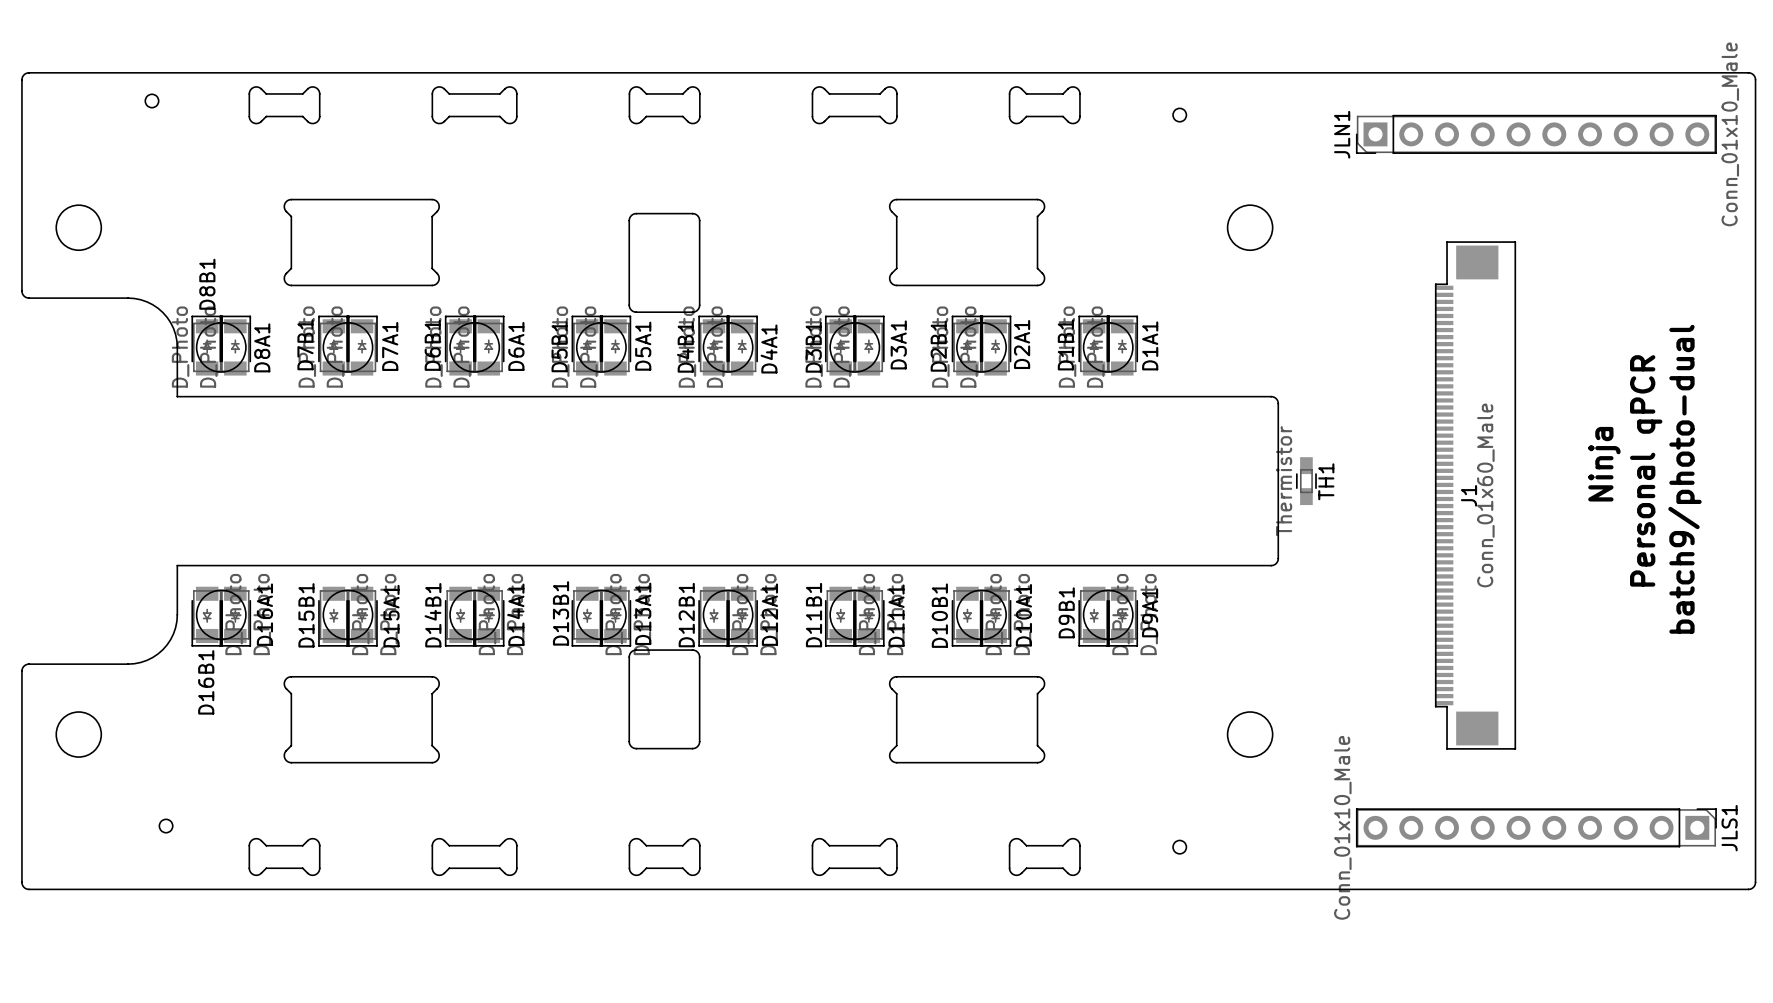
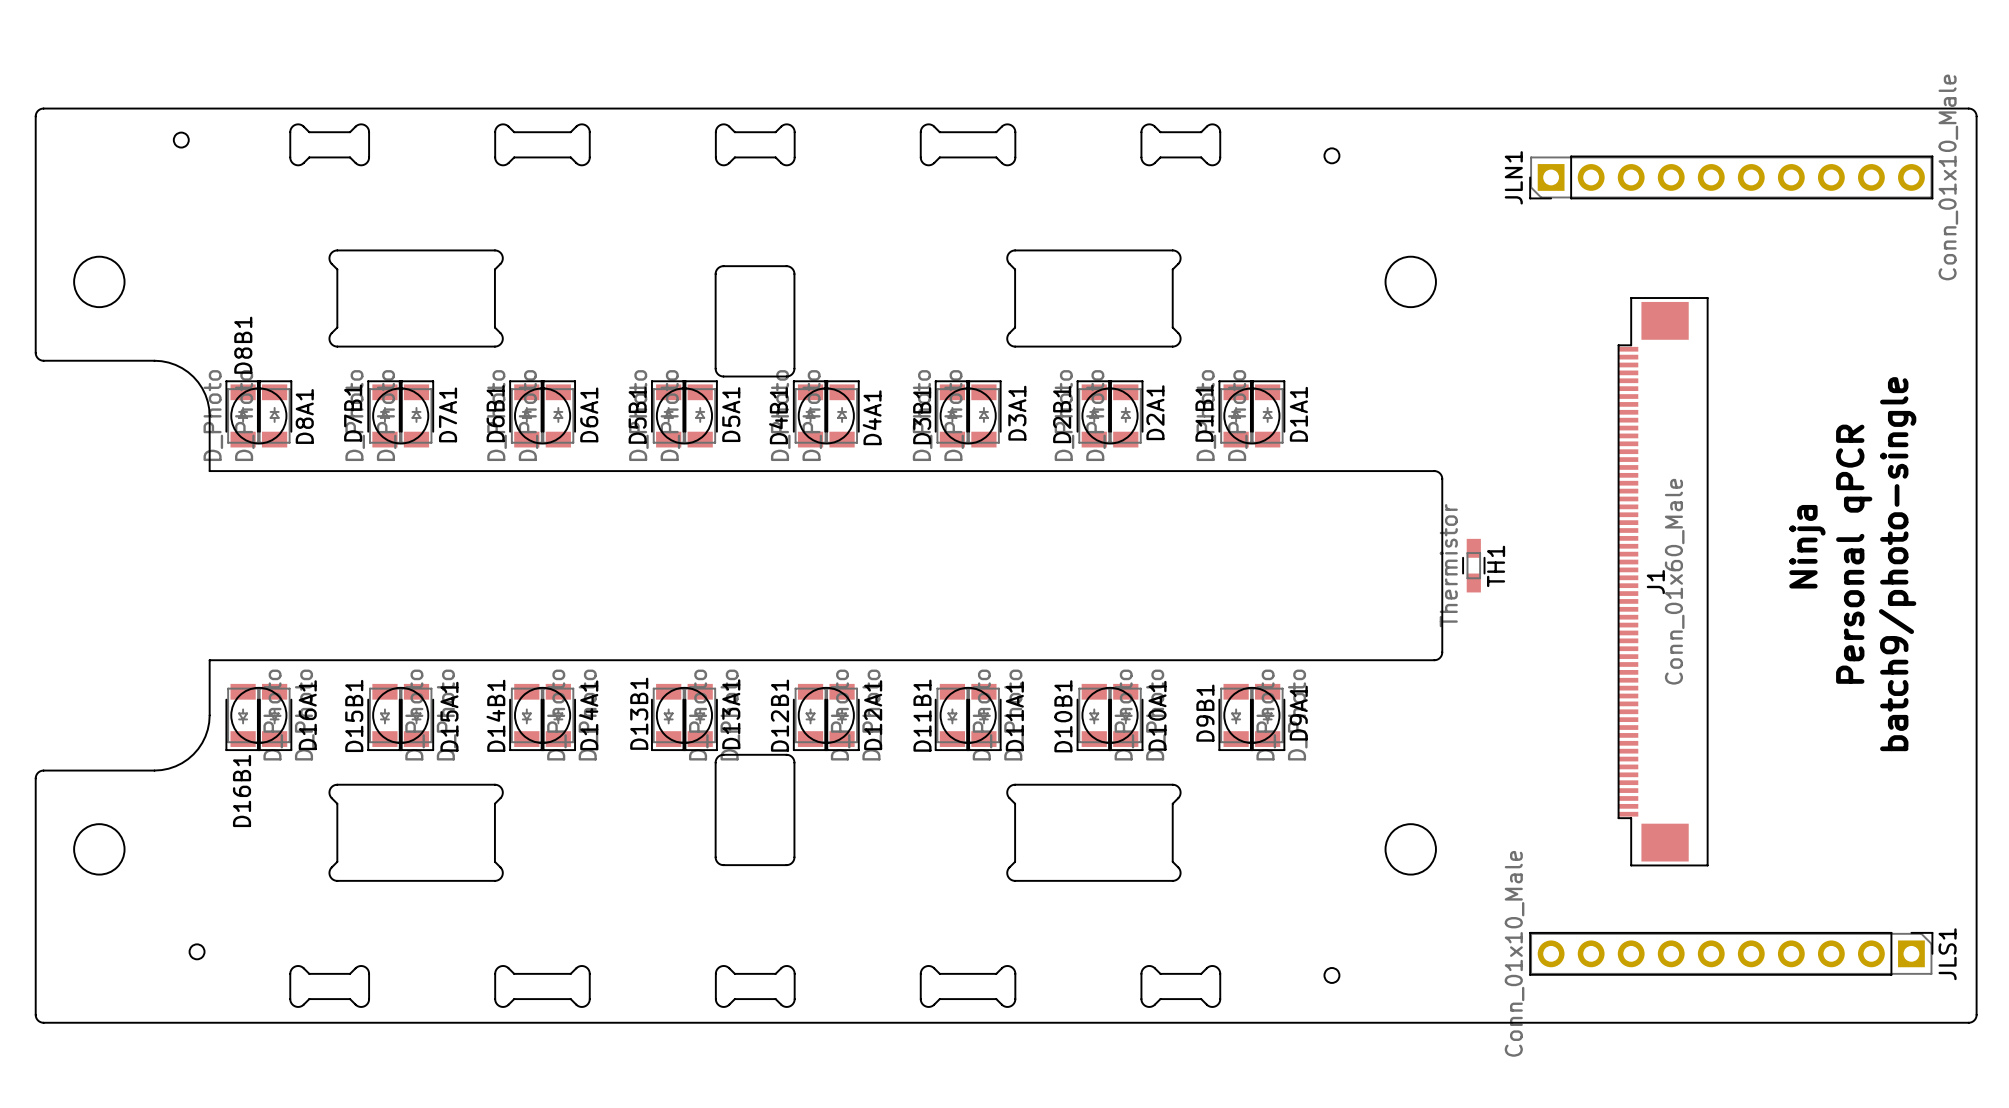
text: batch9/photo-dual (1684, 479) -> batch9/photo-single (1897, 564)

